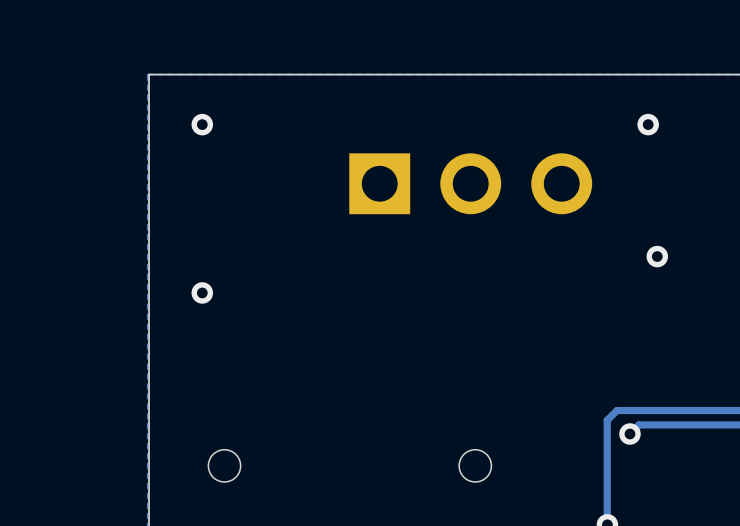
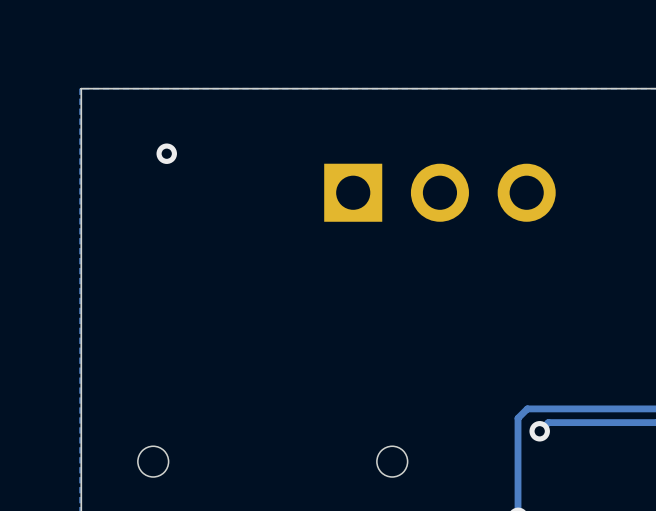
via position: (202, 124) -> (166, 153)
via: (648, 124) -> none
part position: (470, 183) -> (439, 192)
via: (657, 256) -> none
via: (202, 292) -> none

